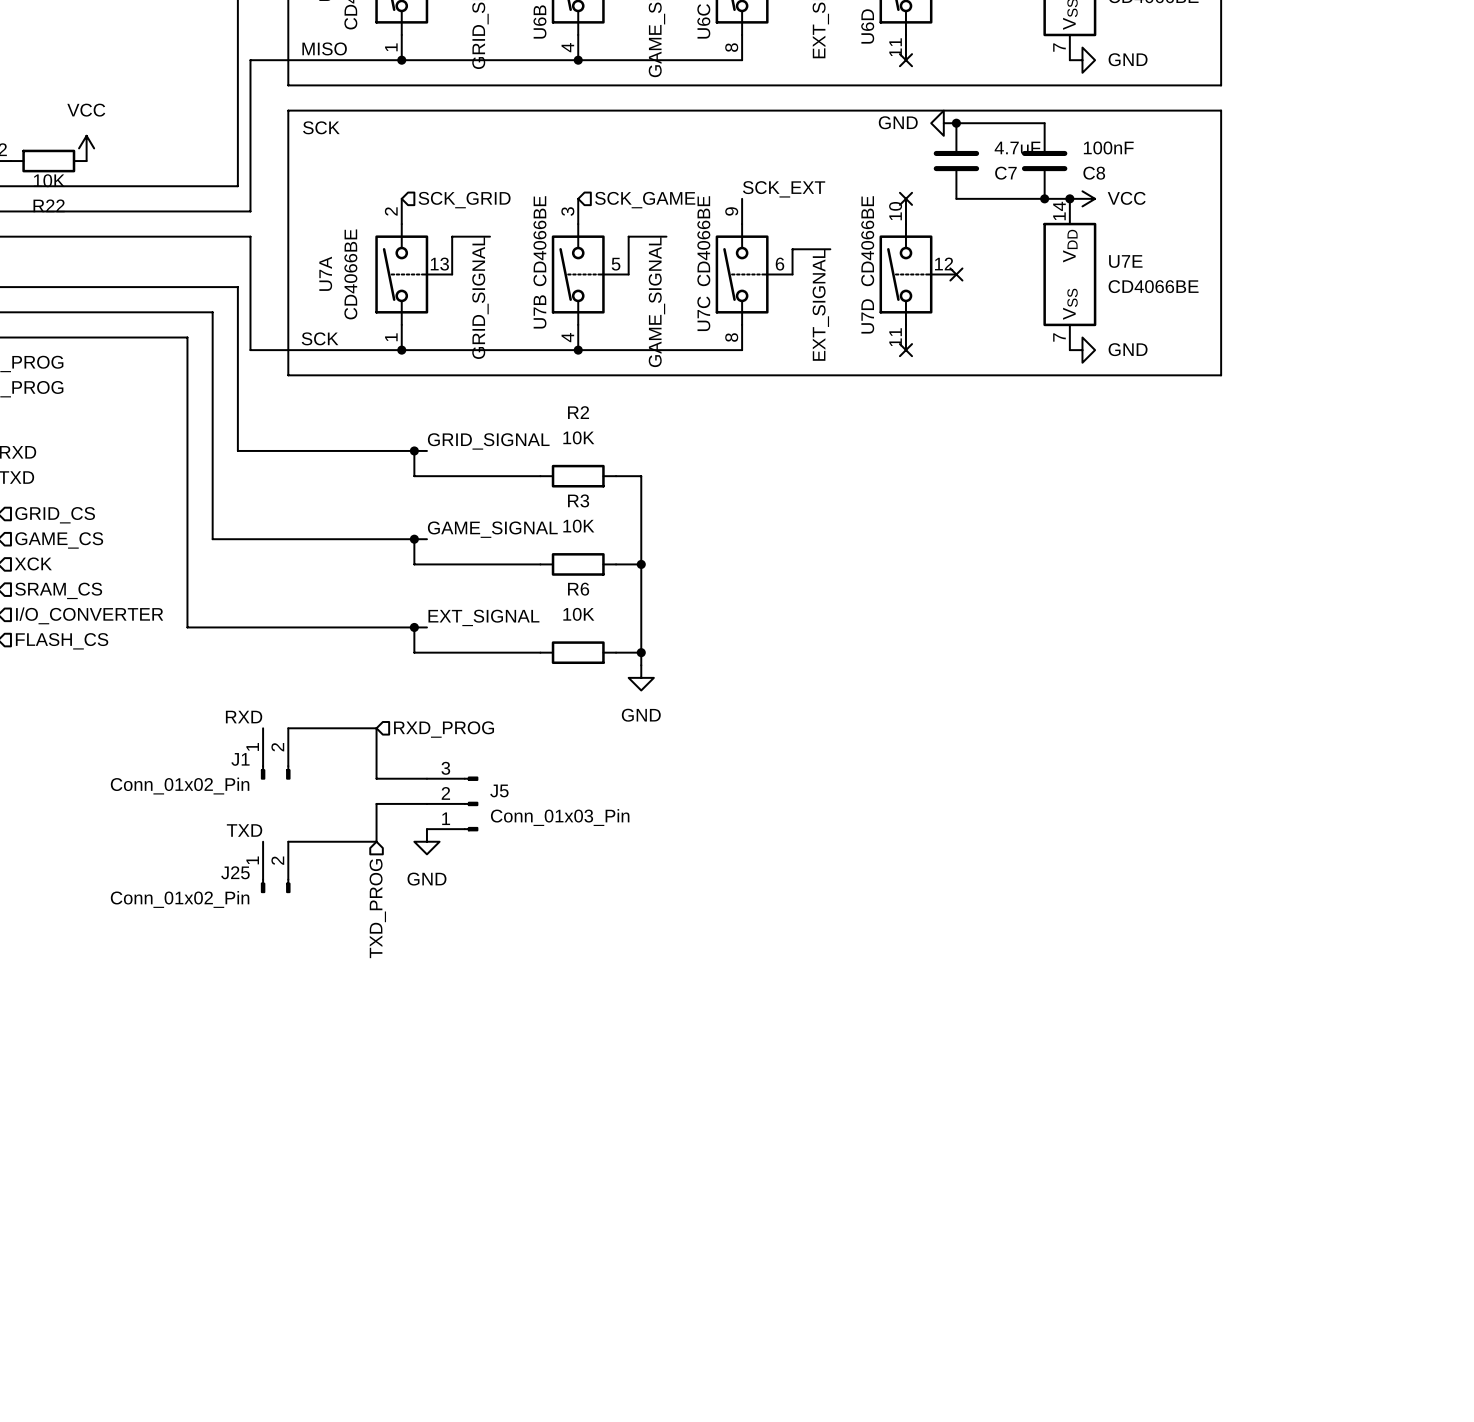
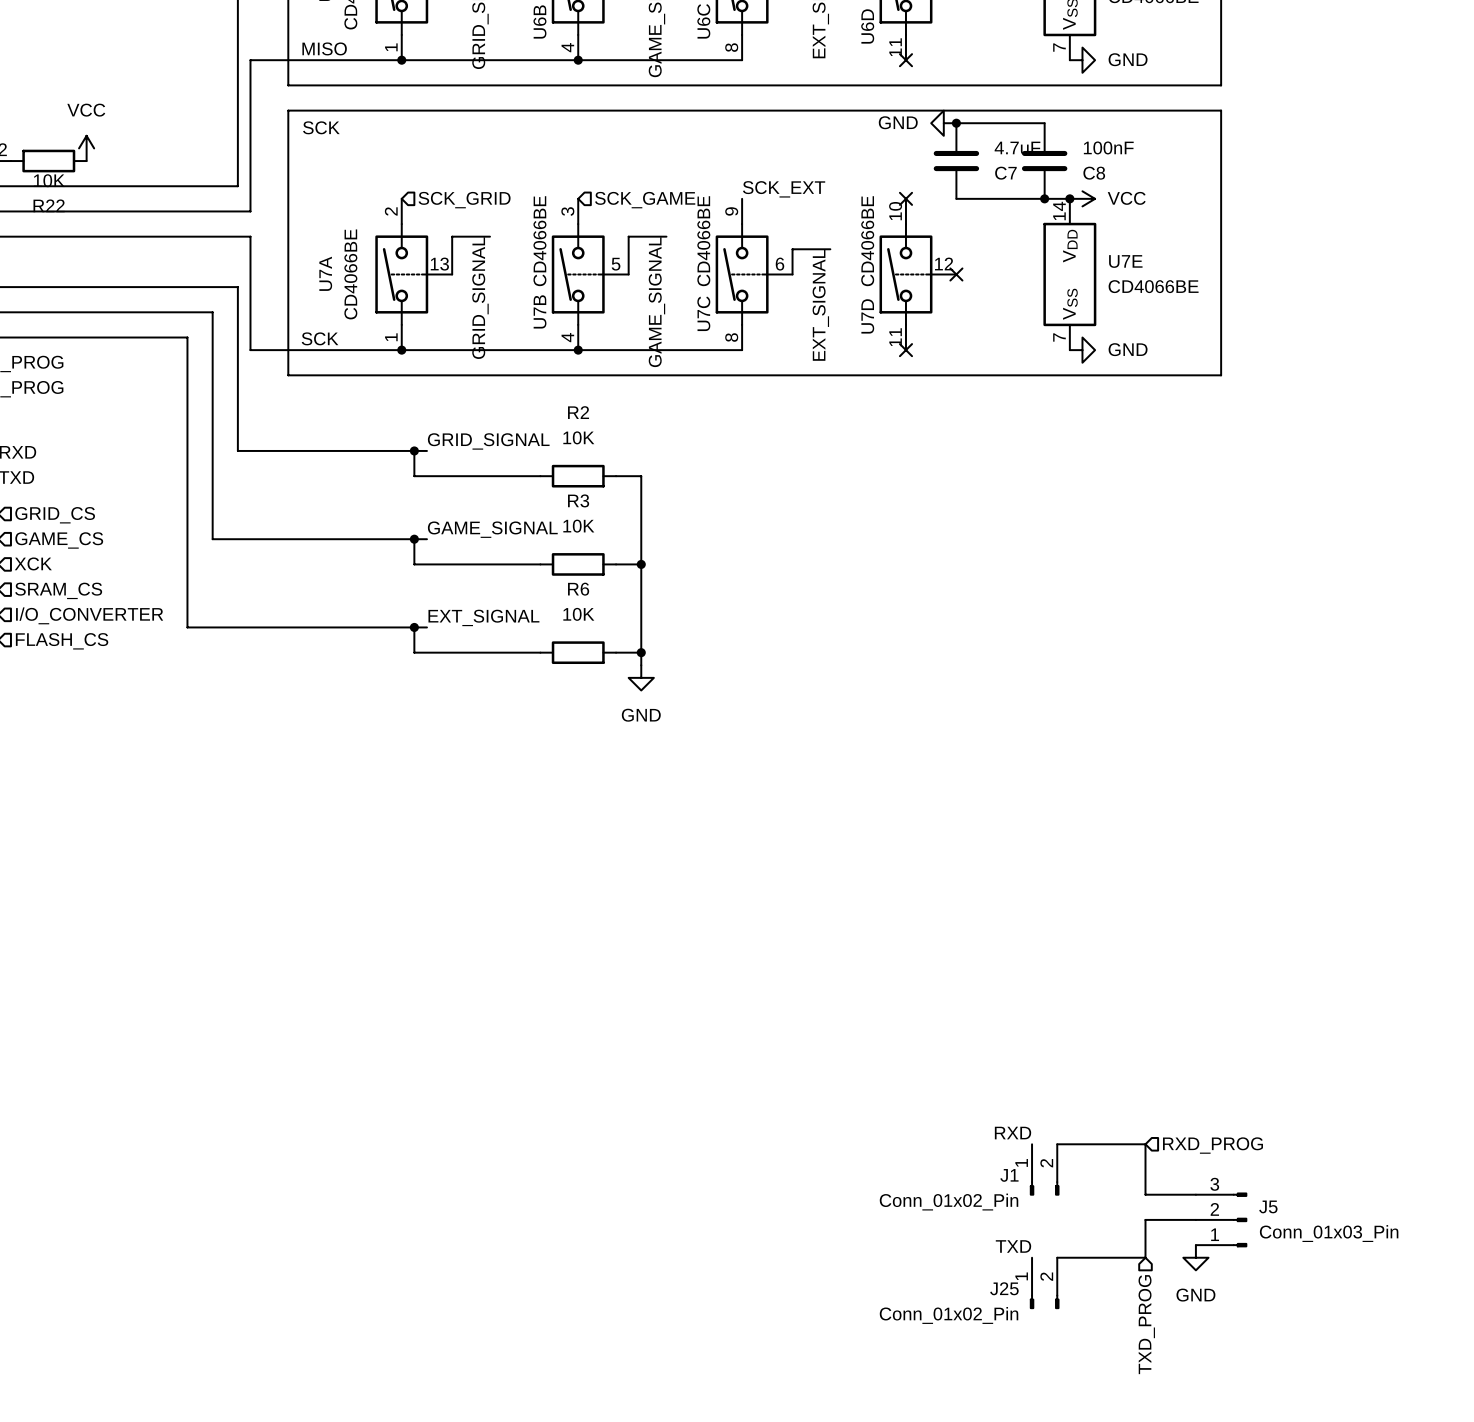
label: RXD (244, 717) -> none
wire: (288, 728) (376, 728) (376, 778) (426, 778) -> none
hierarchical label: RXD_PROG (444, 729) -> none
J1 position: (275, 753) -> (1044, 1169)
wire: (426, 803) (376, 803) (376, 841) (288, 841) -> none
J5 position: (452, 803) -> (1221, 1219)
label: TXD (244, 830) -> none
power symbol: GND (426, 841) -> none
J25 position: (275, 867) -> (1044, 1283)
hierarchical label: TXD_PROG (377, 908) -> none
label: none -> RXD (1013, 1133)
wire: none -> (1057, 1144) (1145, 1144) (1145, 1194) (1195, 1194)
hierarchical label: none -> RXD_PROG (1212, 1145)
wire: none -> (1195, 1219) (1145, 1219) (1145, 1257) (1057, 1257)
label: none -> TXD (1013, 1246)
power symbol: none -> GND (1195, 1257)
hierarchical label: none -> TXD_PROG (1146, 1324)

